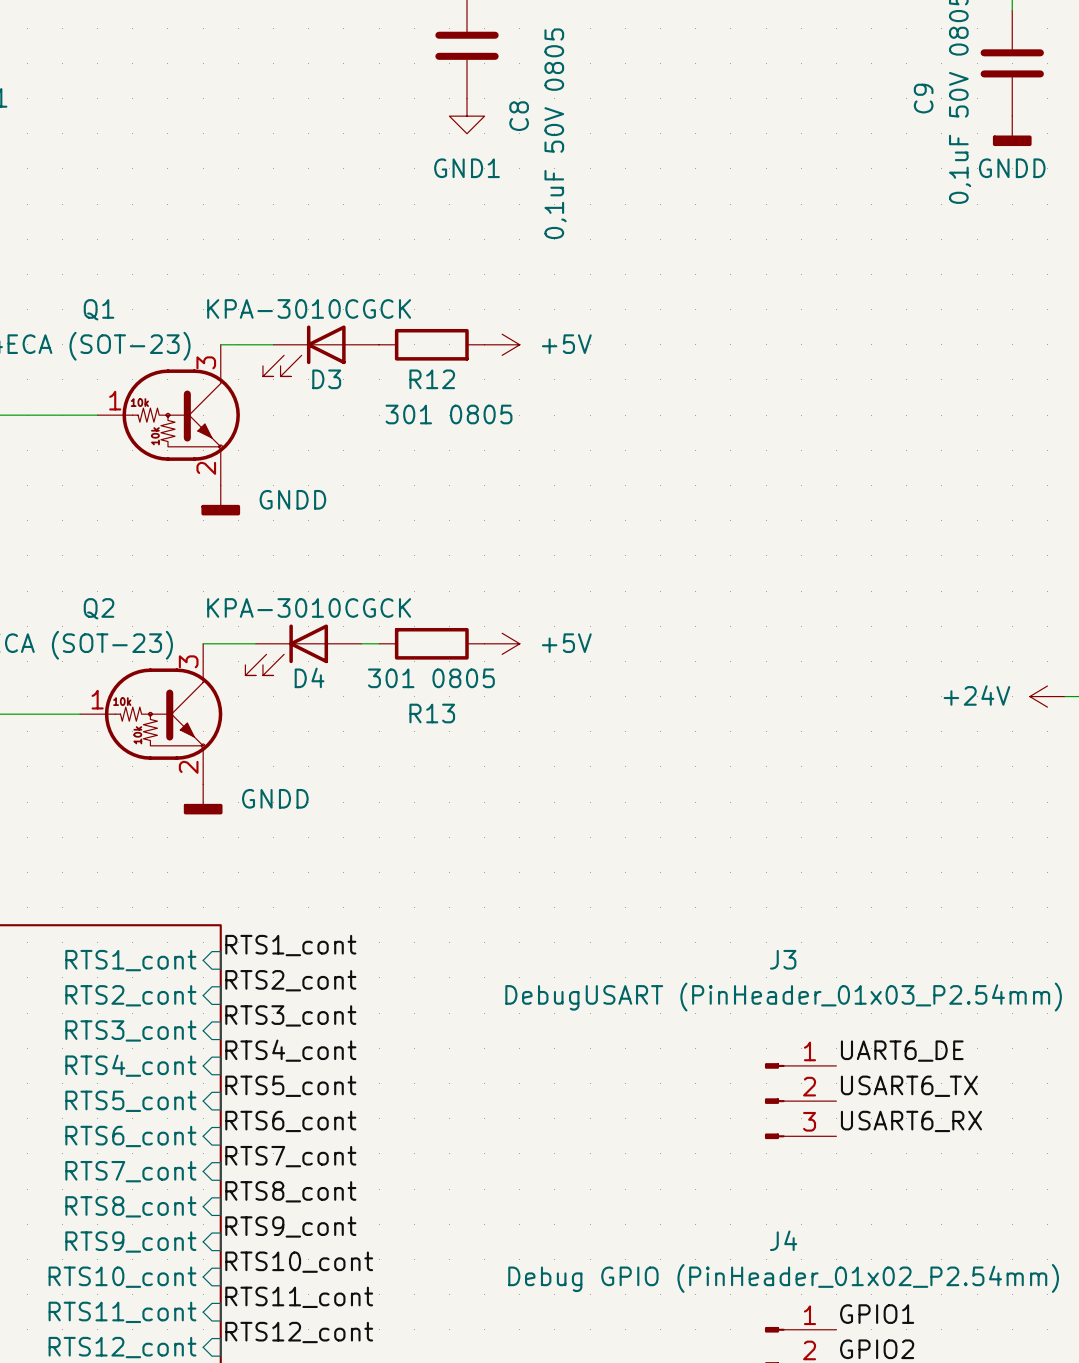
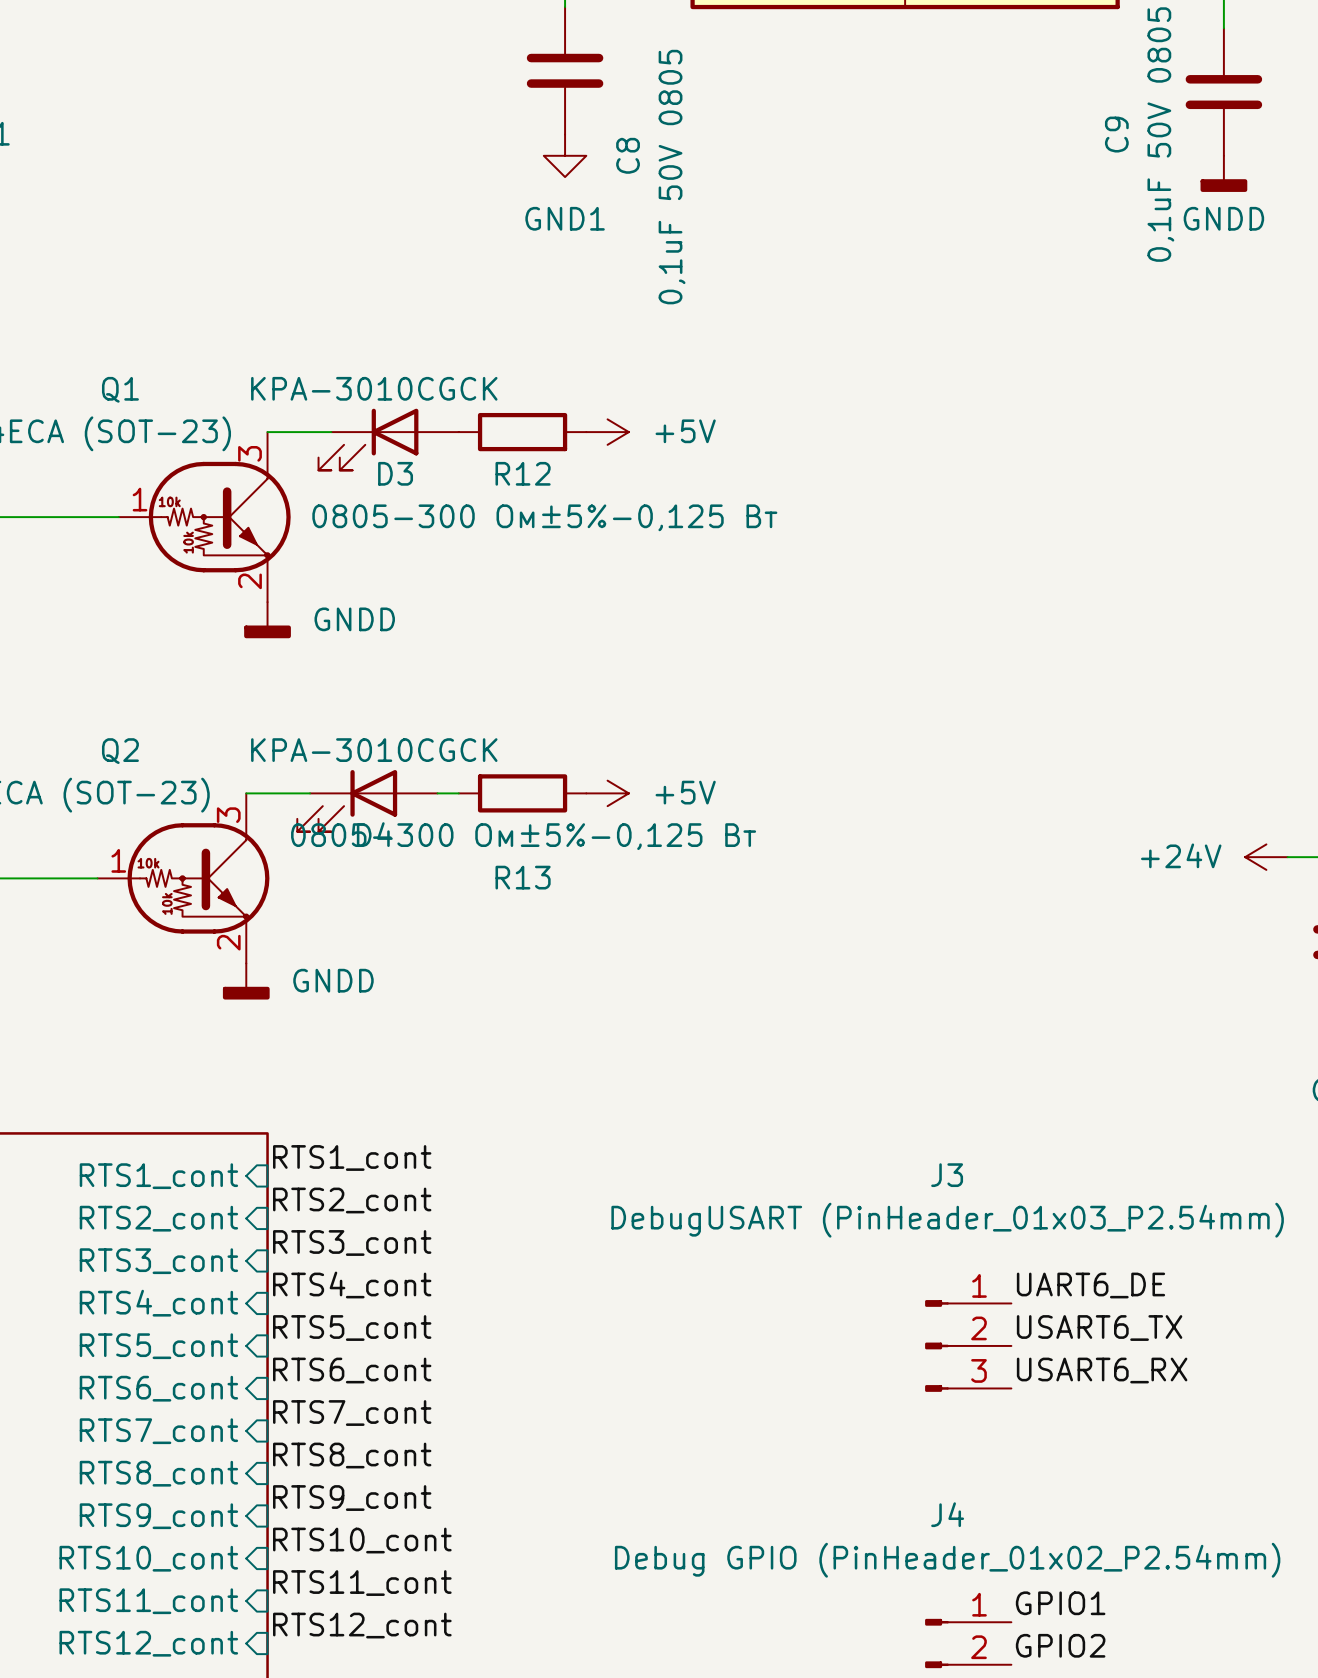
R12 value: 301 0805 (448, 414) -> 0805-300 Ом±5%-0,125 Вт (544, 517)
R13 value: 301 0805 (431, 678) -> 0805-300 Ом±5%-0,125 Вт (523, 836)

